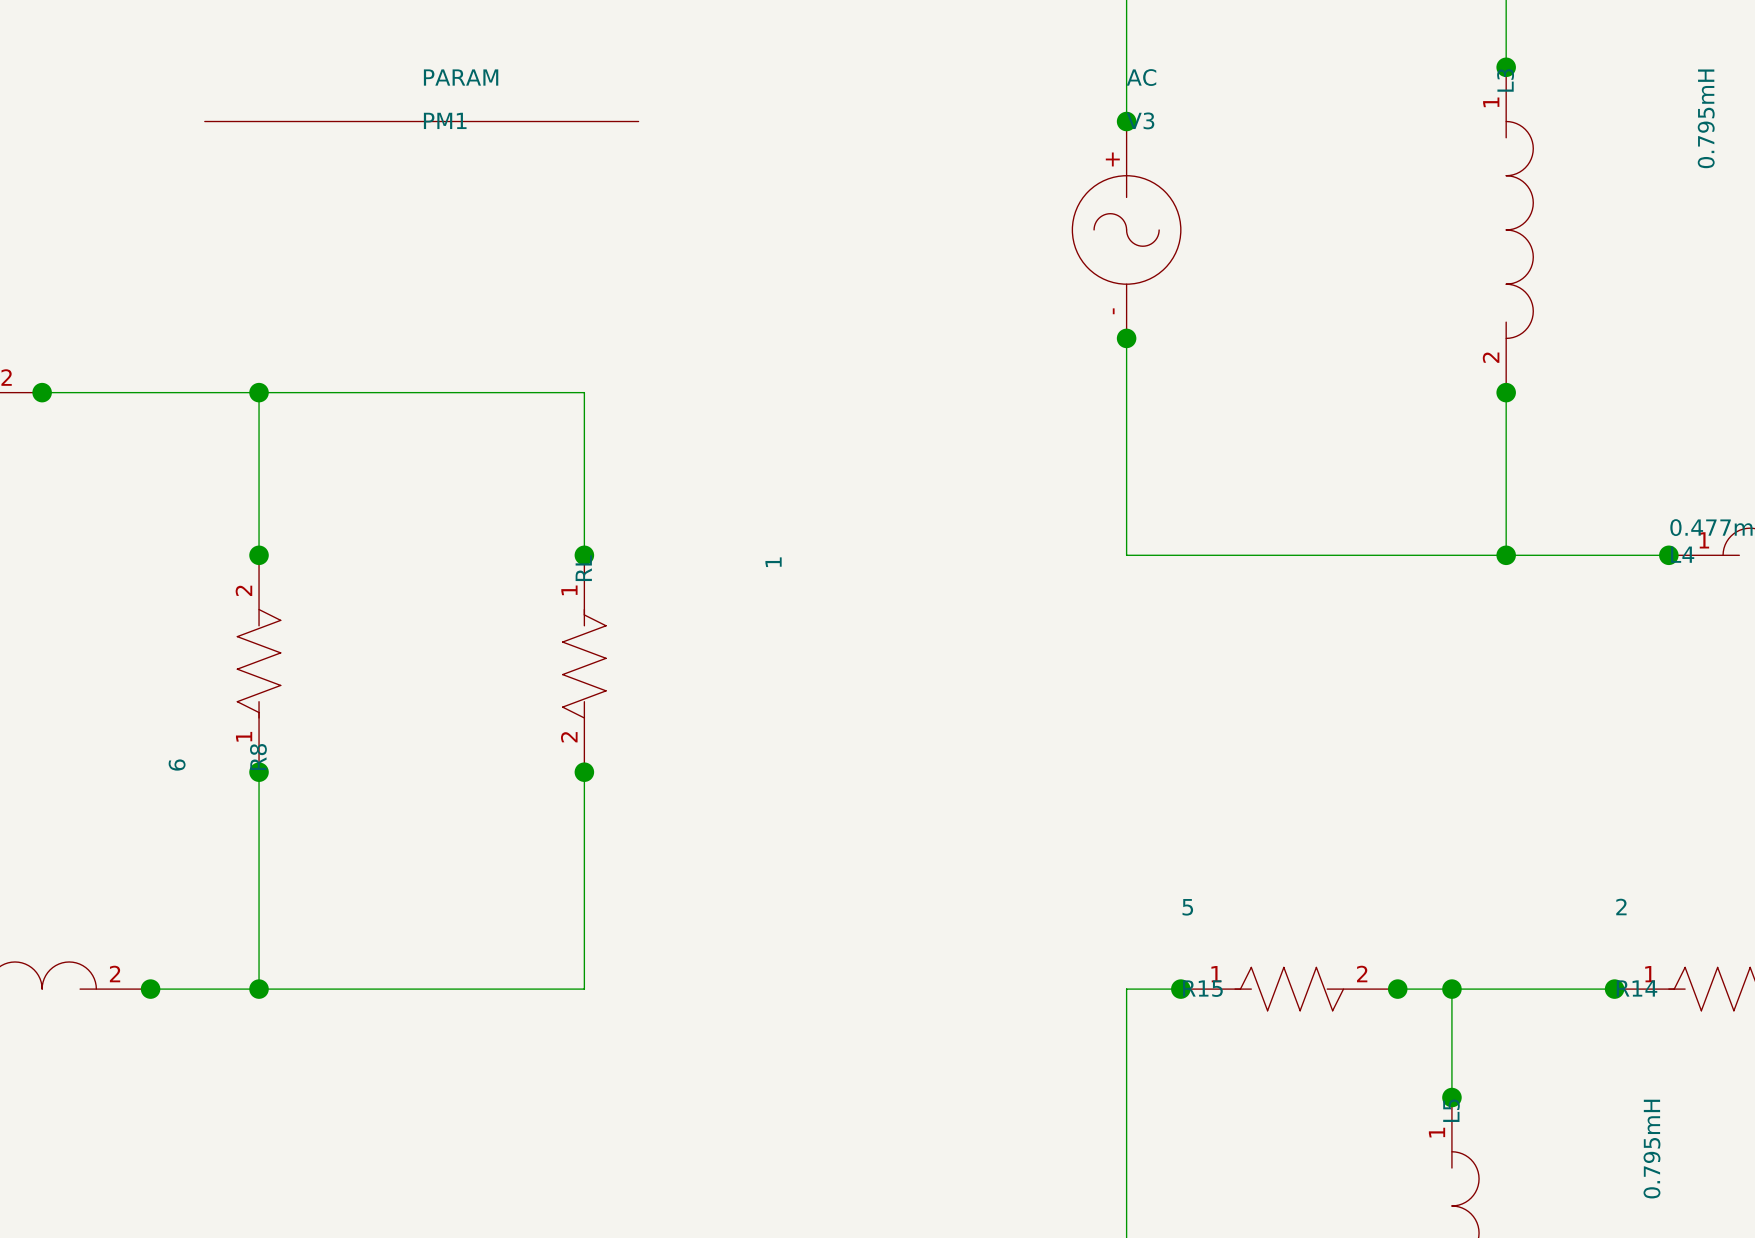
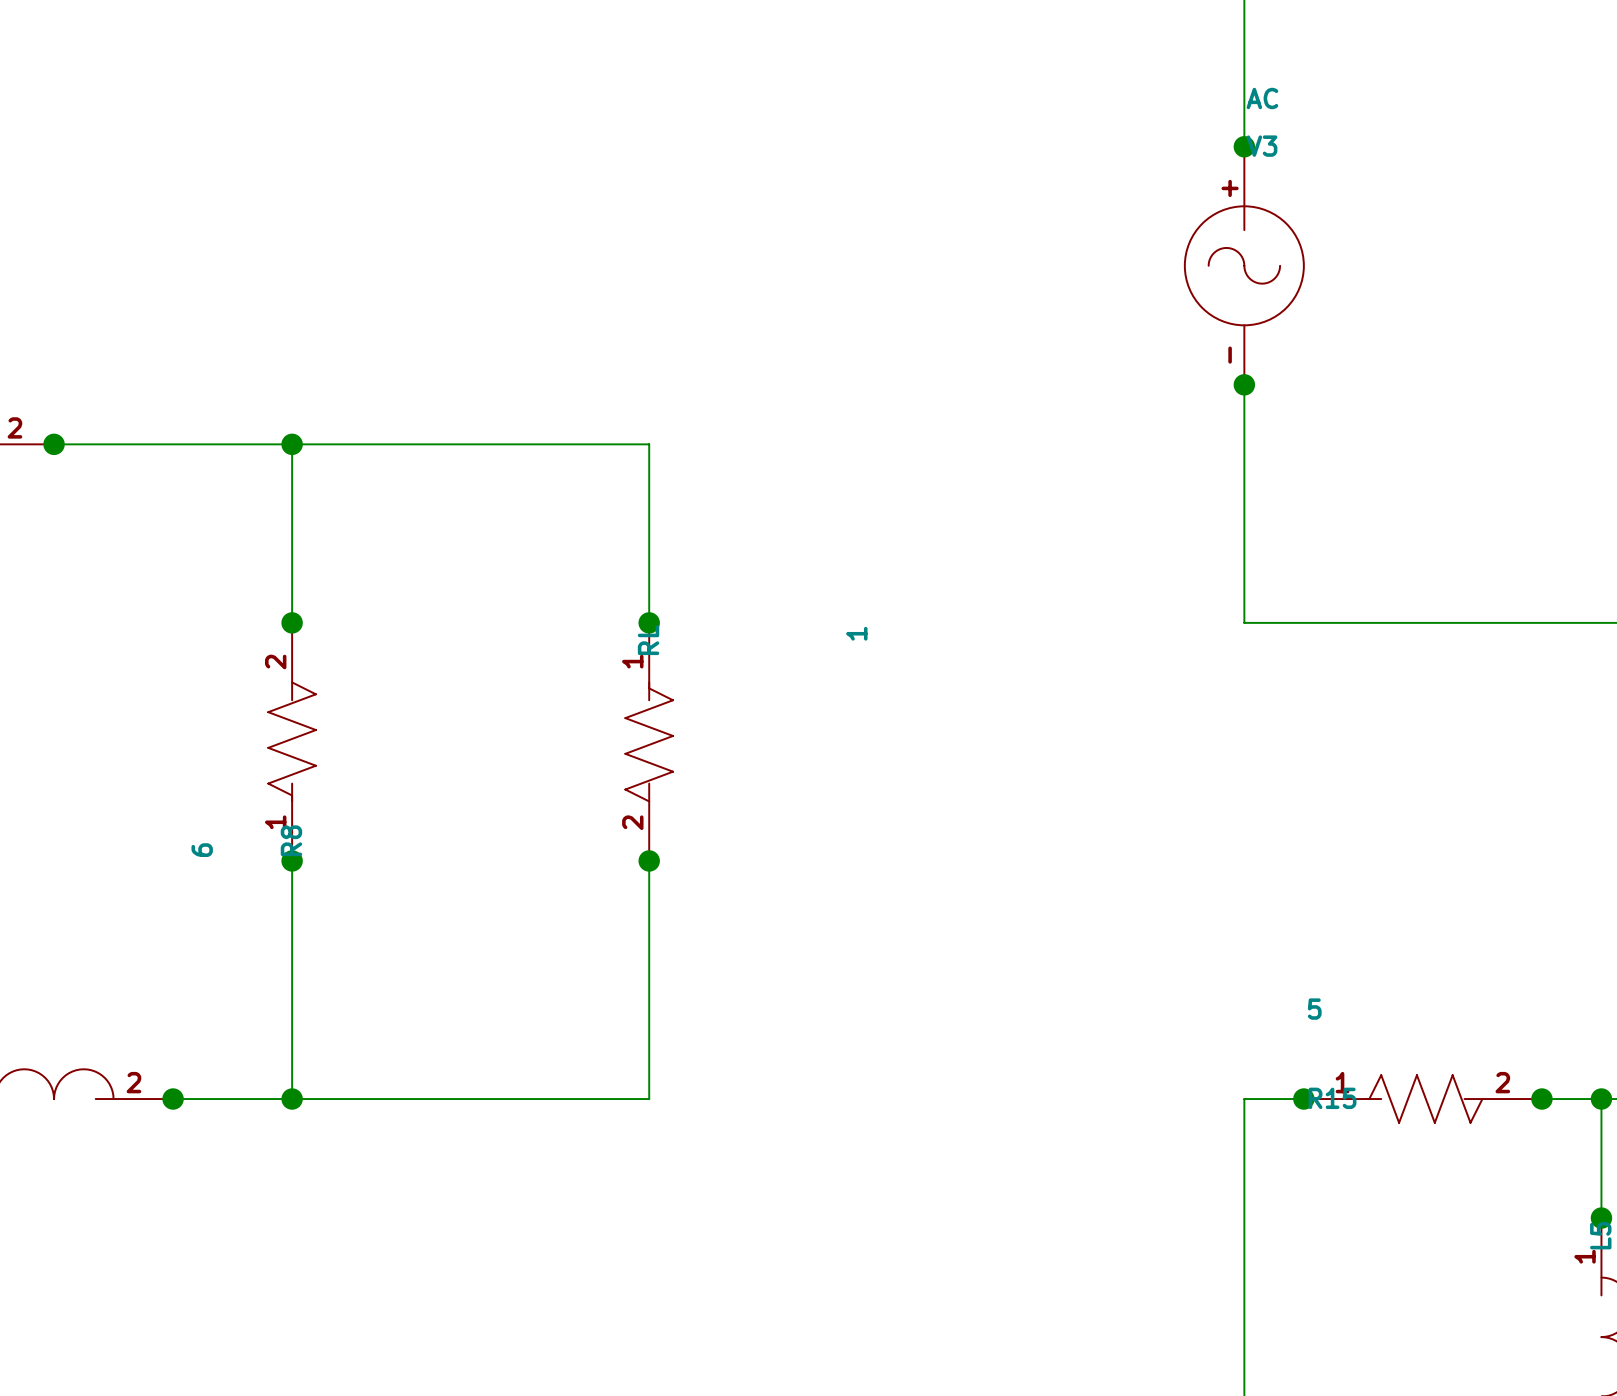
PM1: PARAM (421, 121) -> none

